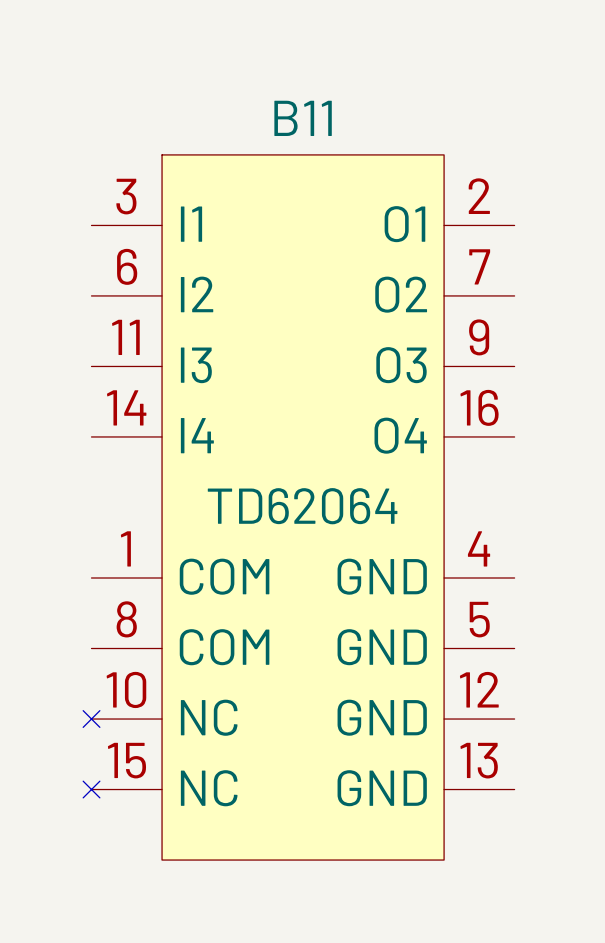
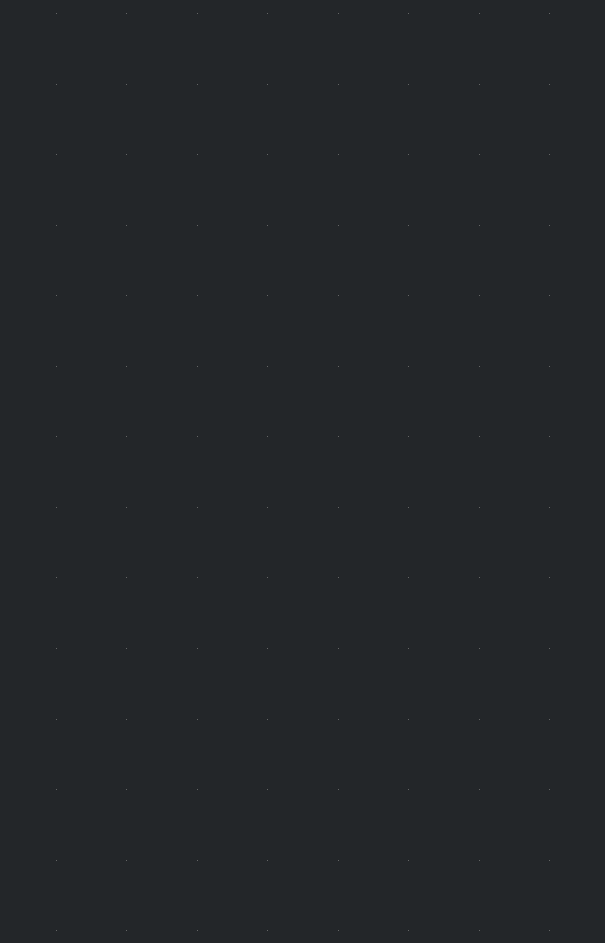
B11: TD62064 (298, 507) -> none

